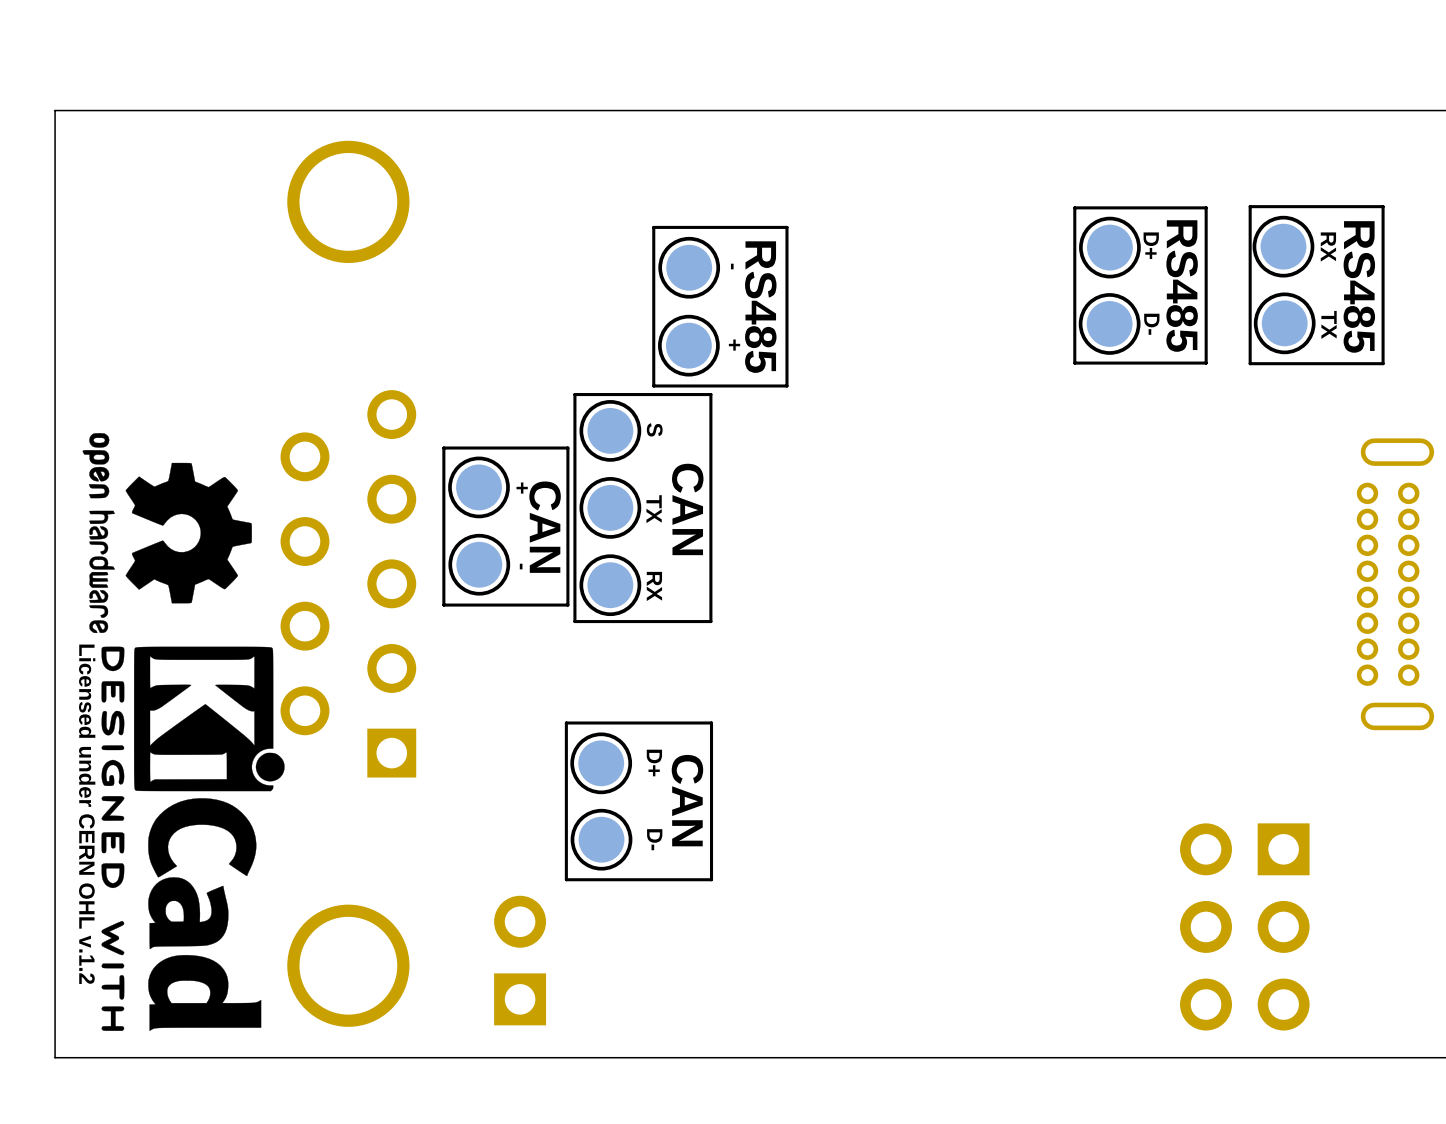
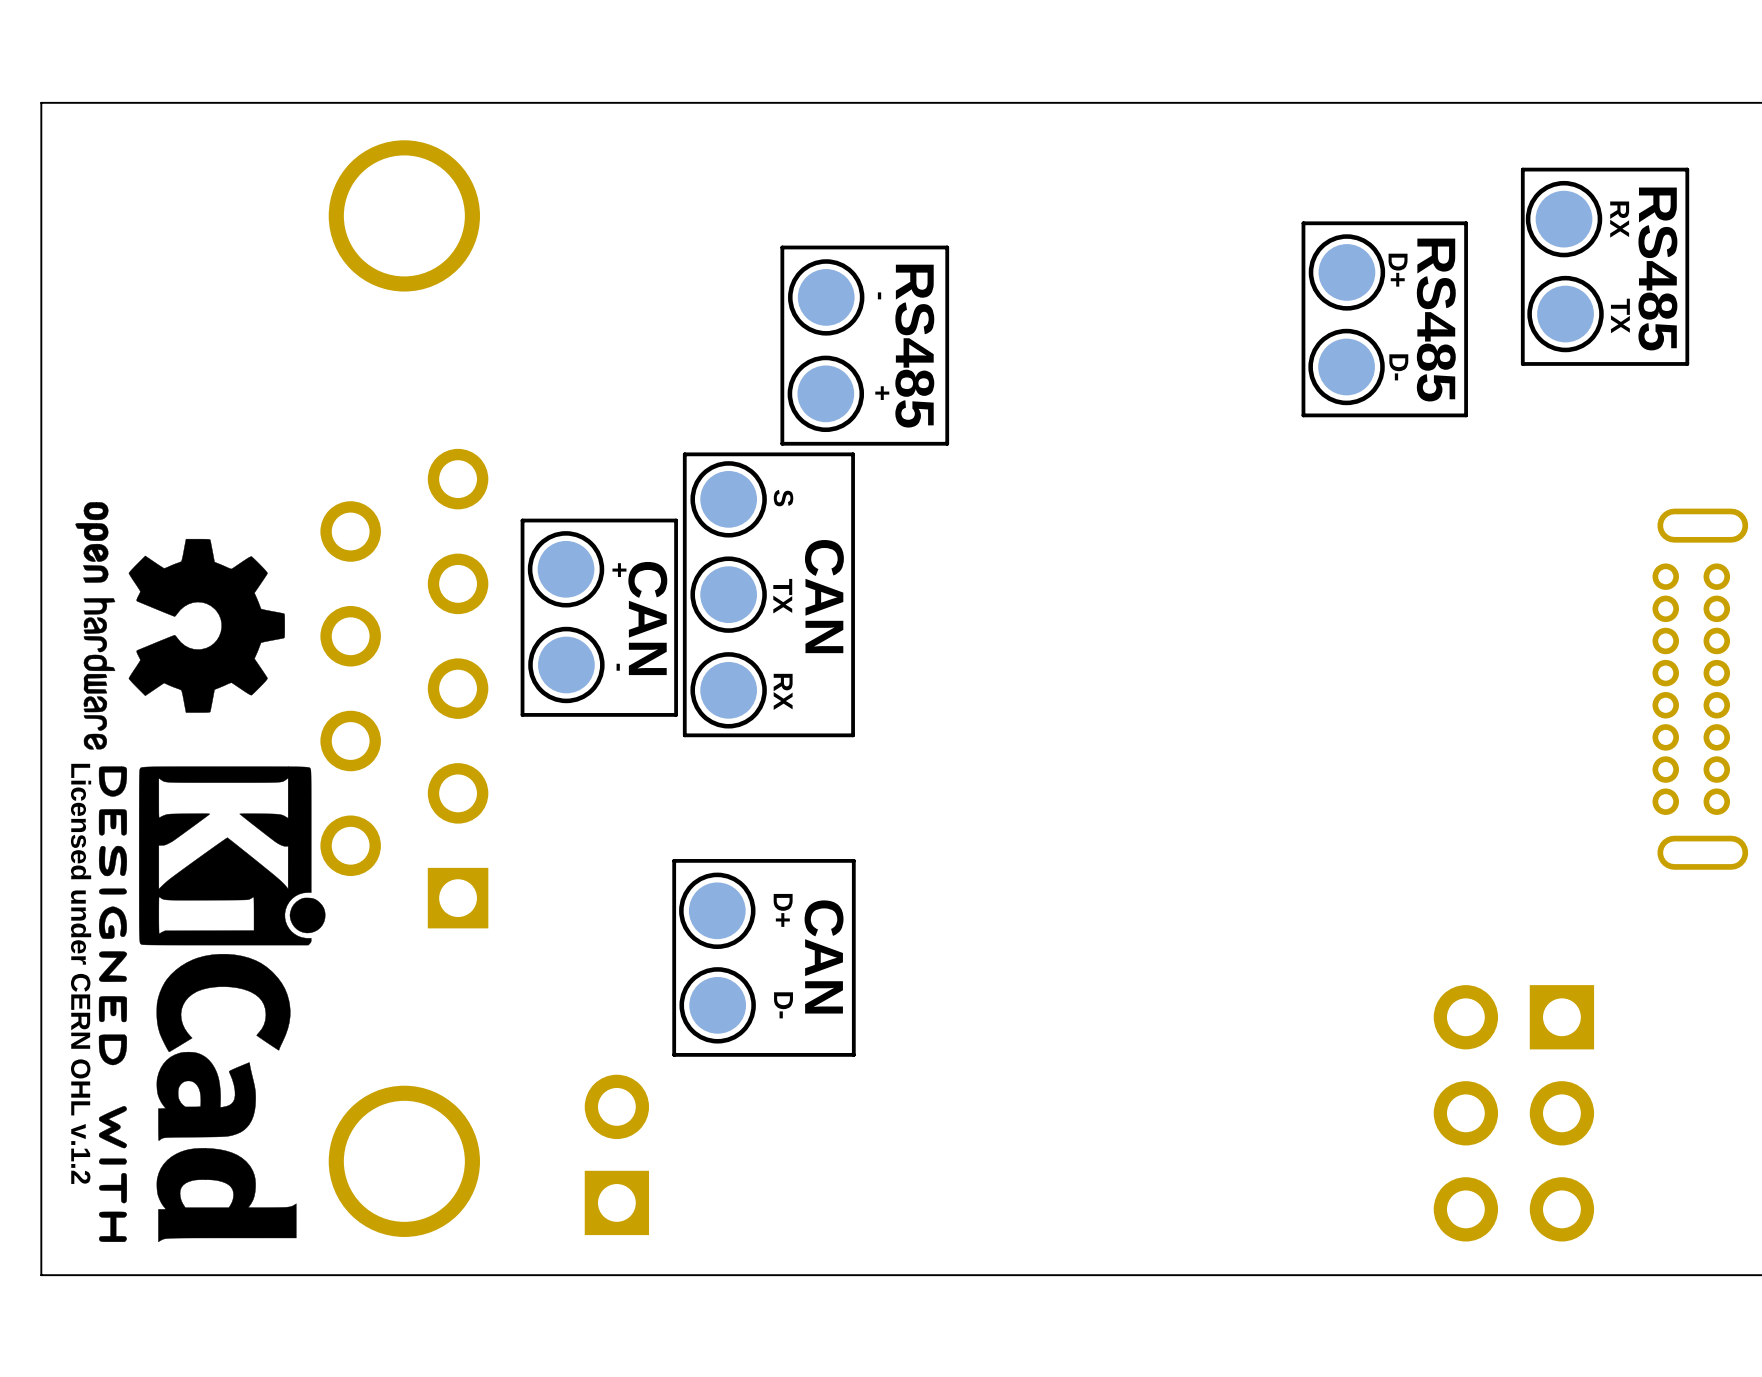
part: none -> (1564, 219)
line: (1383, 206) (1250, 206) (1250, 363) (1383, 363) (1383, 206) -> (1687, 169) (1687, 363) (1522, 363) (1522, 169) (1687, 169)
part: (1283, 246) -> none
text position: RX (1328, 247) -> RX (1619, 219)
part: none -> (1565, 314)
text position: RS485 (1359, 286) -> RS485 (1657, 268)
part: (1284, 323) -> none
text position: TX (1329, 324) -> TX (1620, 315)

